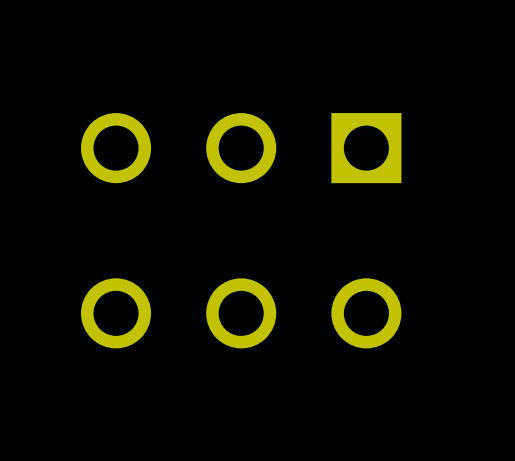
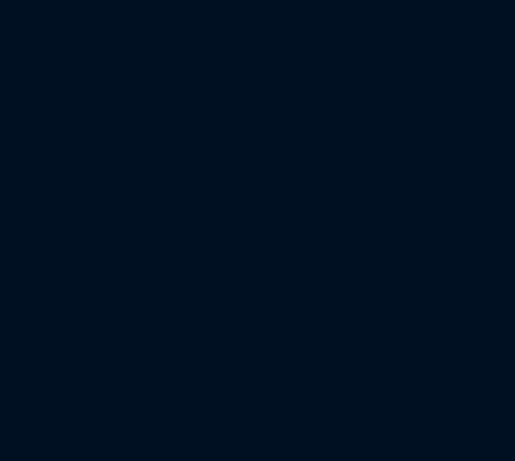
part: (241, 230) -> none

